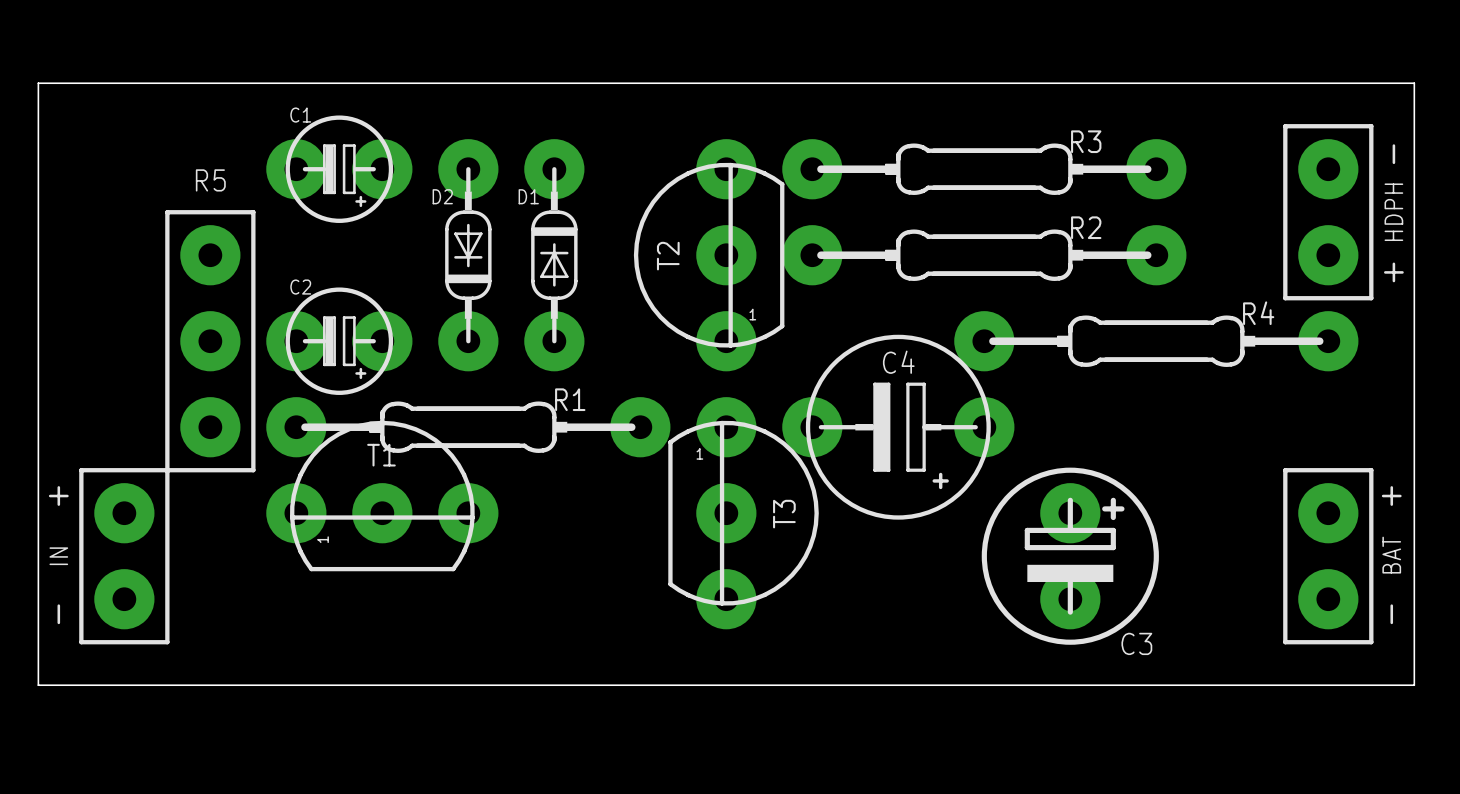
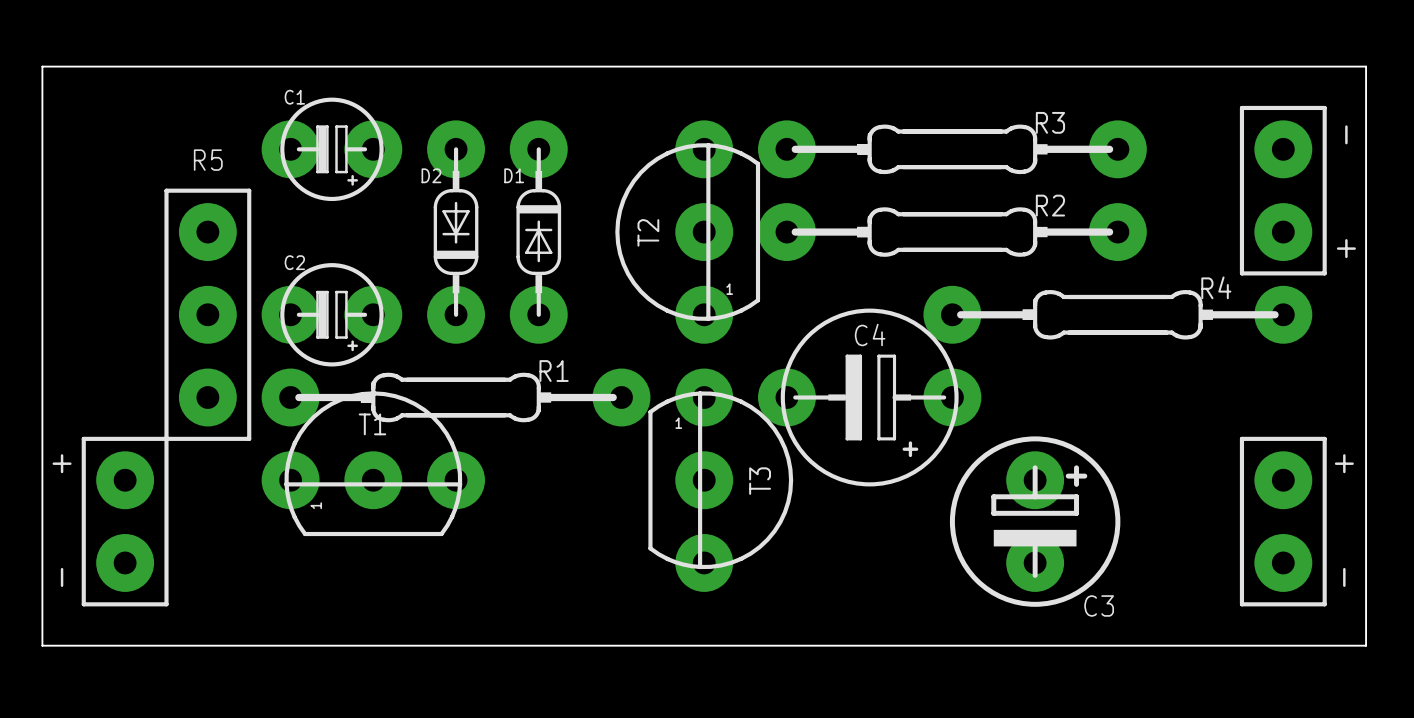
HDPH name: HDPH (1393, 212) -> none
BAT name: BAT (1391, 555) -> none
IN name: IN (58, 556) -> none

